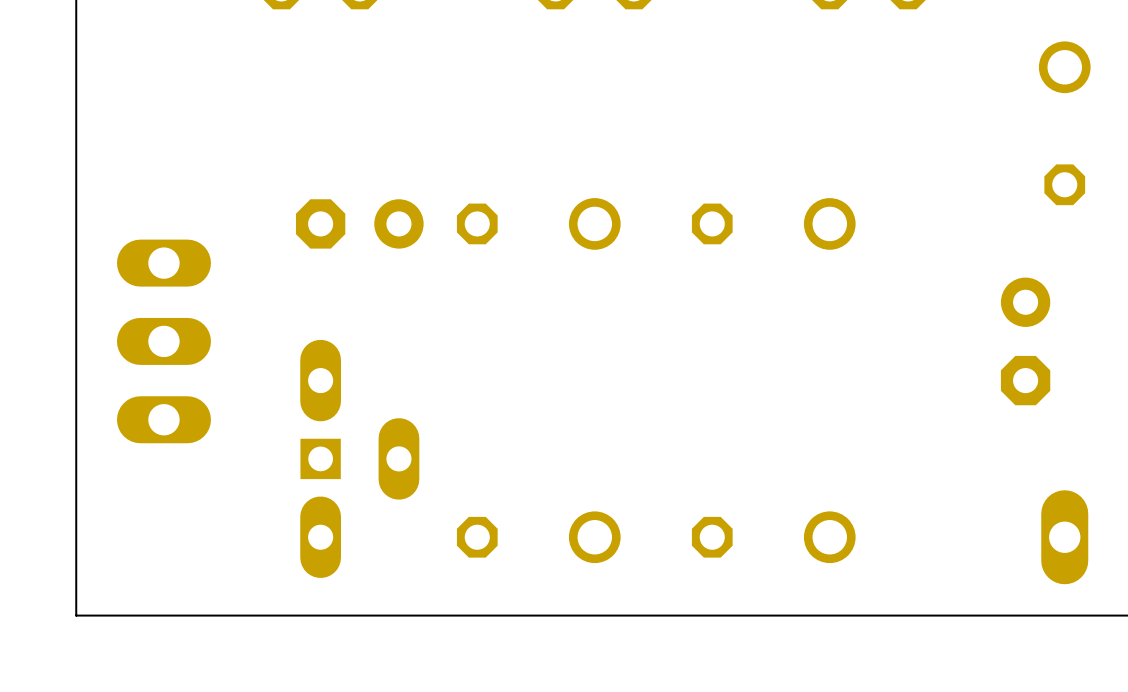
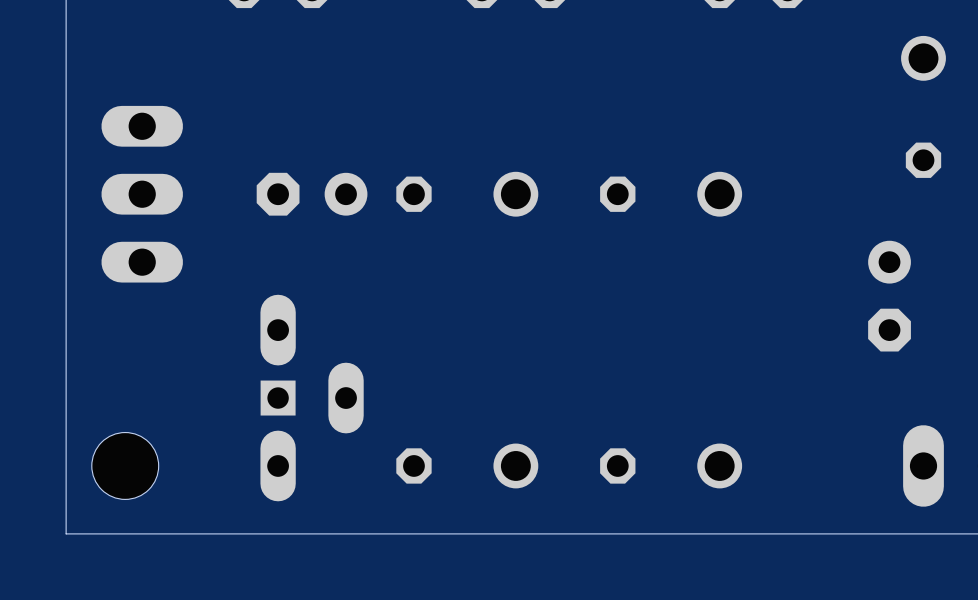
part position: (163, 341) -> (142, 194)
hole: none -> (125, 465)

